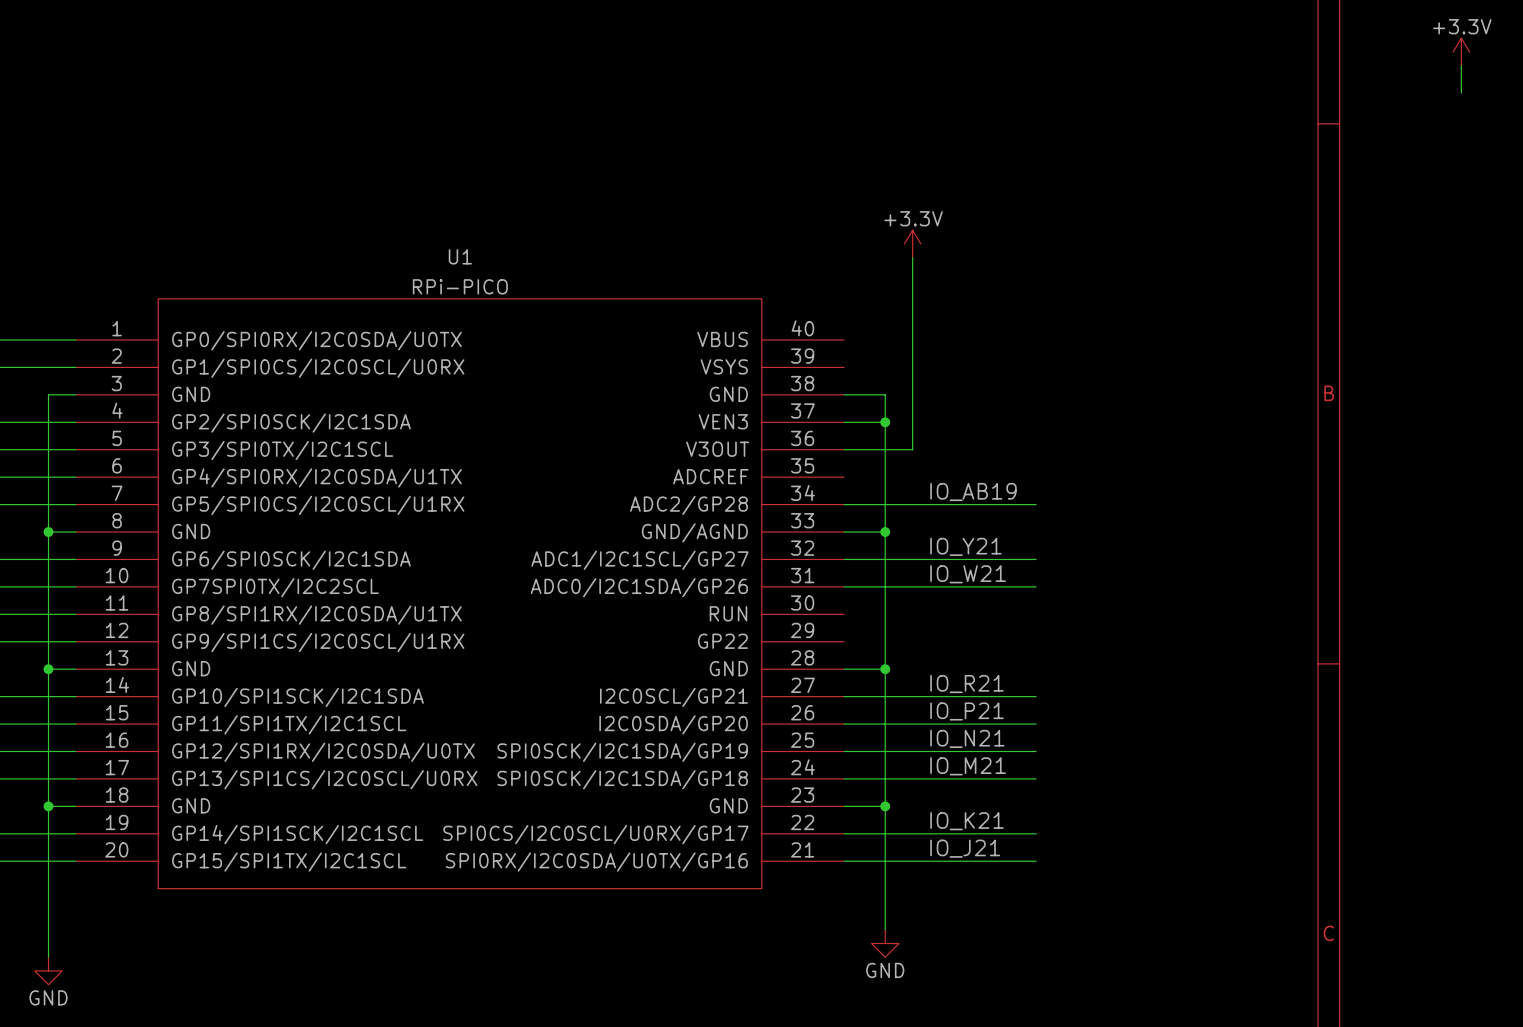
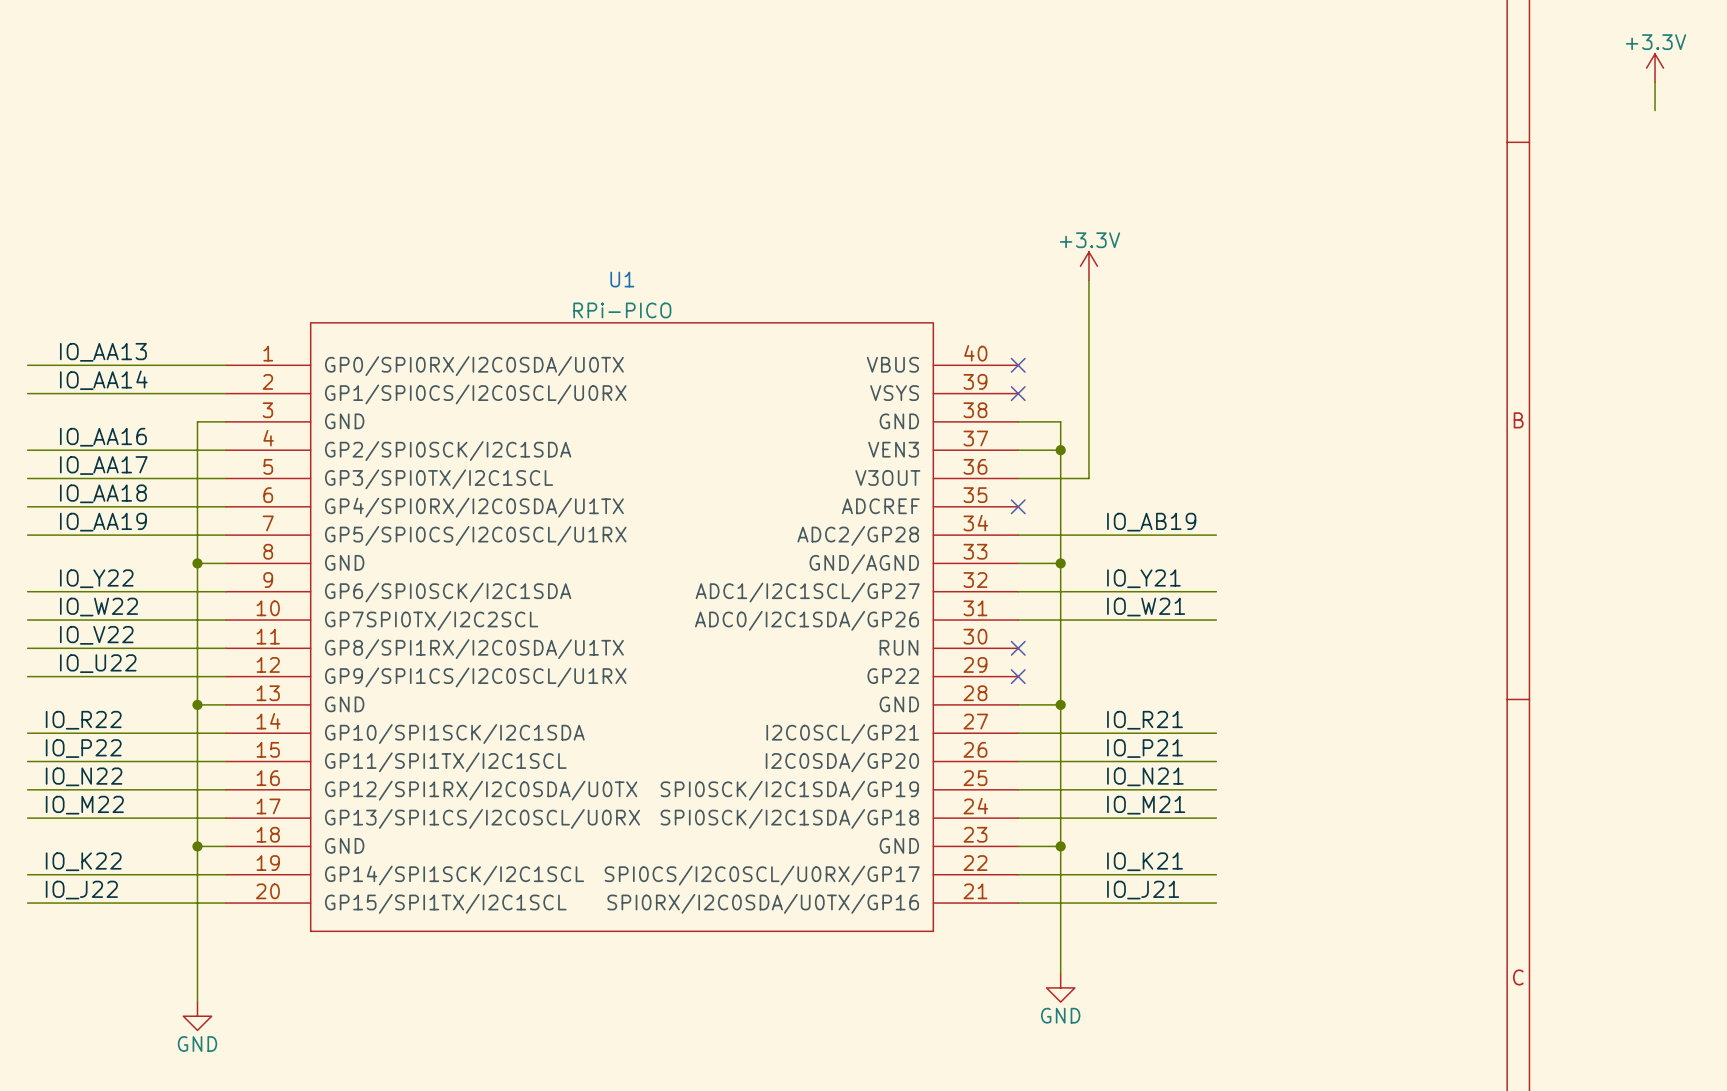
no-connect mark: none -> (1018, 365)
no-connect mark: none -> (1018, 393)
no-connect mark: none -> (1018, 506)
no-connect mark: none -> (1018, 648)
no-connect mark: none -> (1018, 676)

